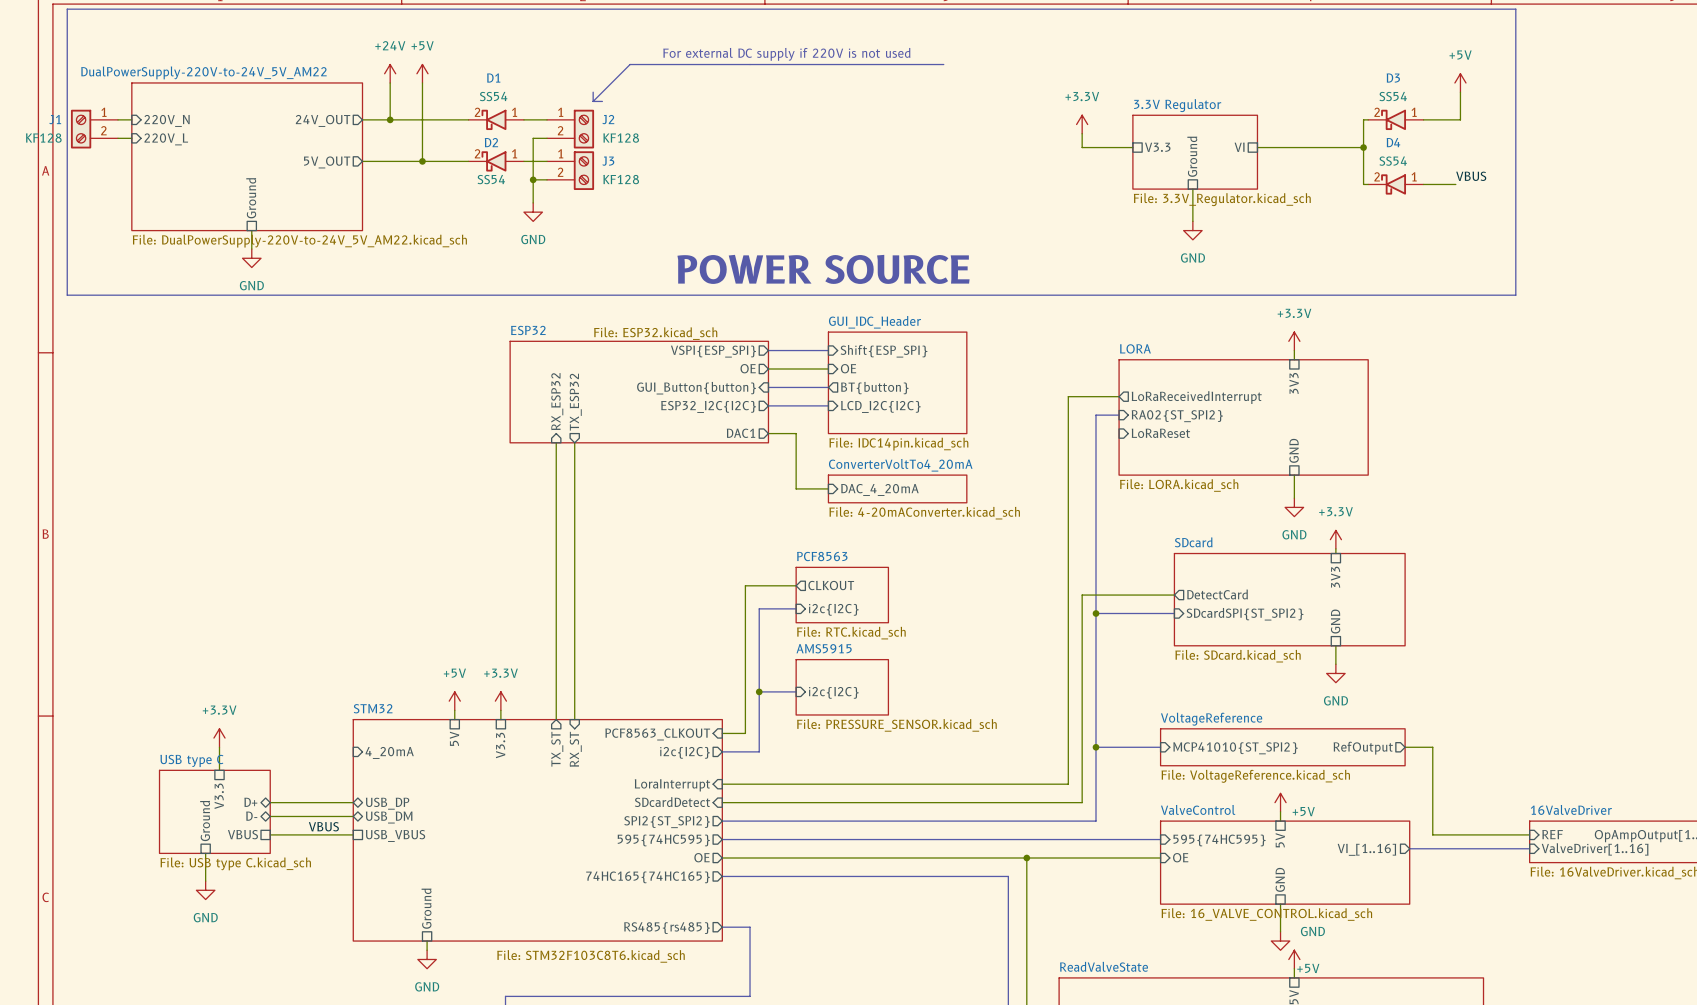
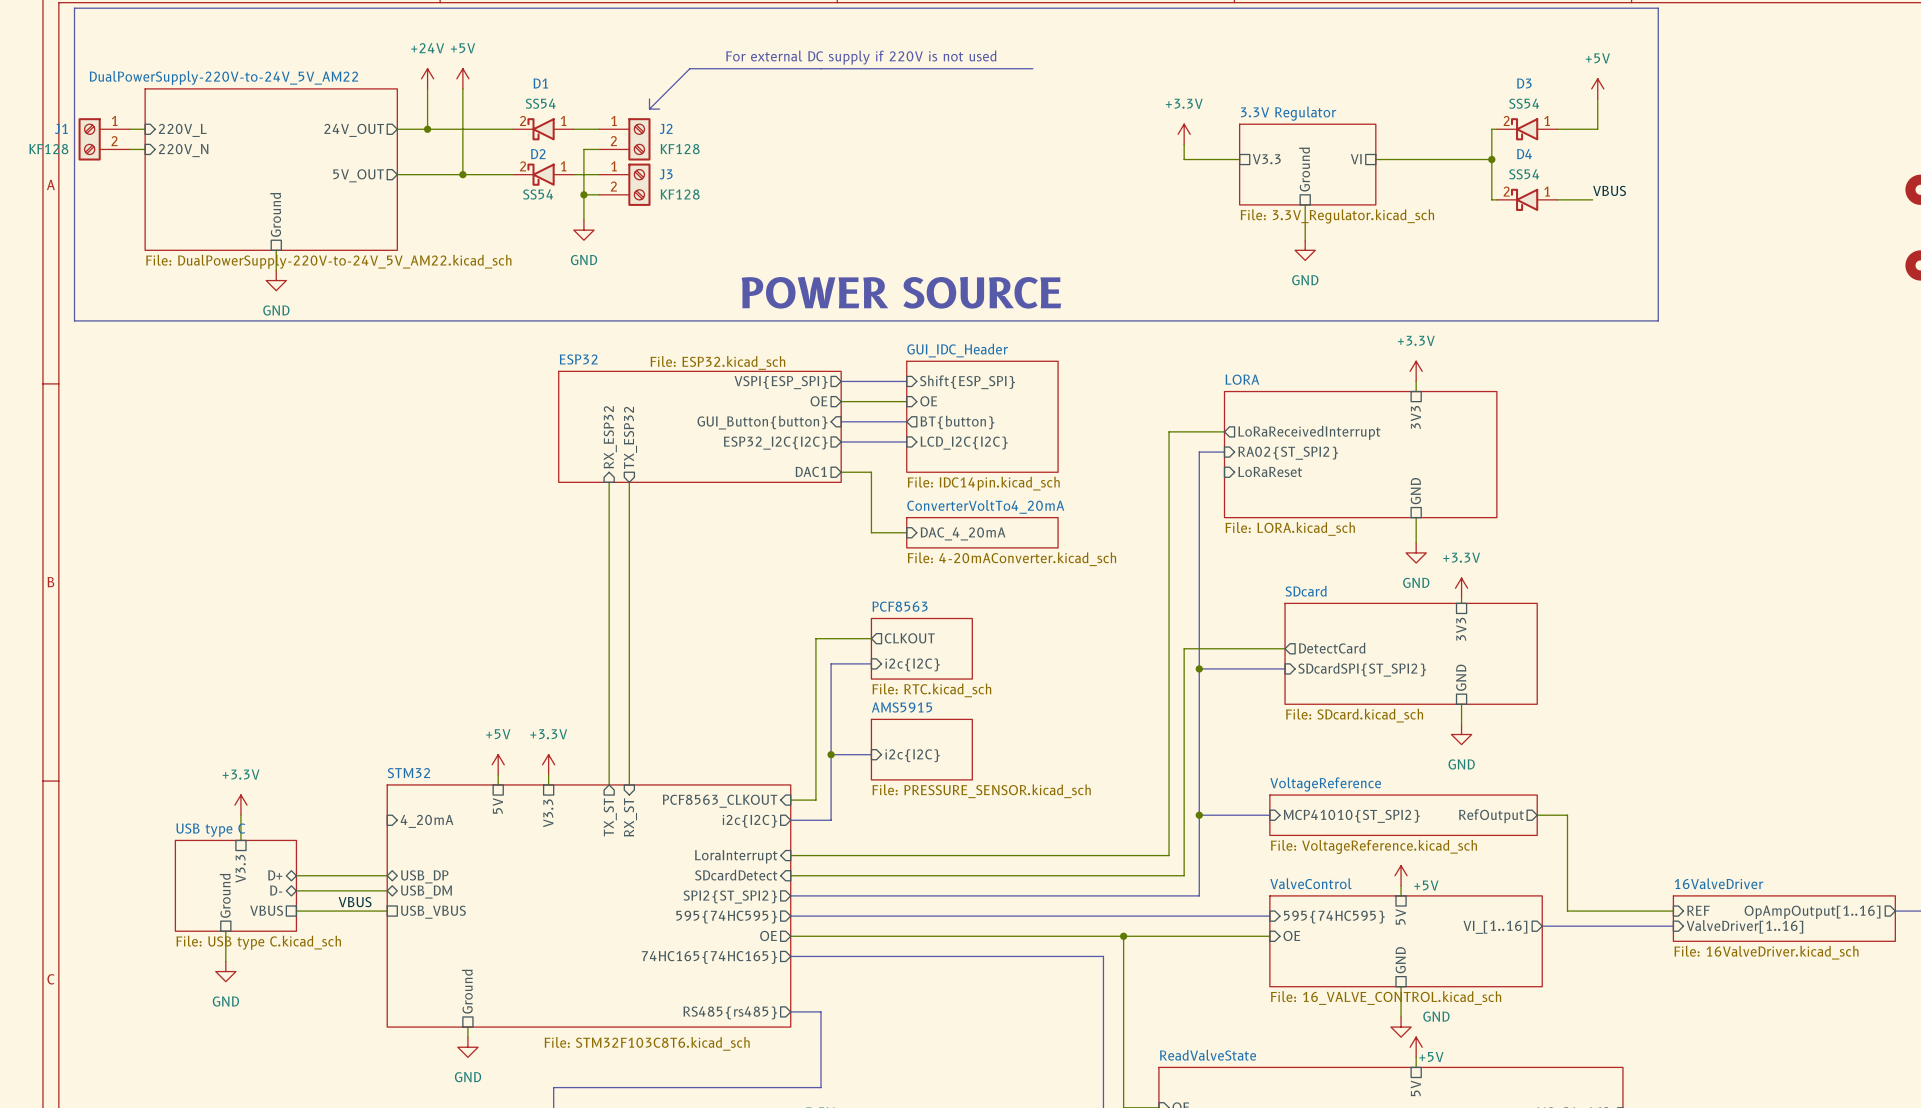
sheet pin: 220V_N (167, 120) -> 220V_L (182, 130)
sheet pin: 220V_L (166, 139) -> 220V_N (183, 150)

